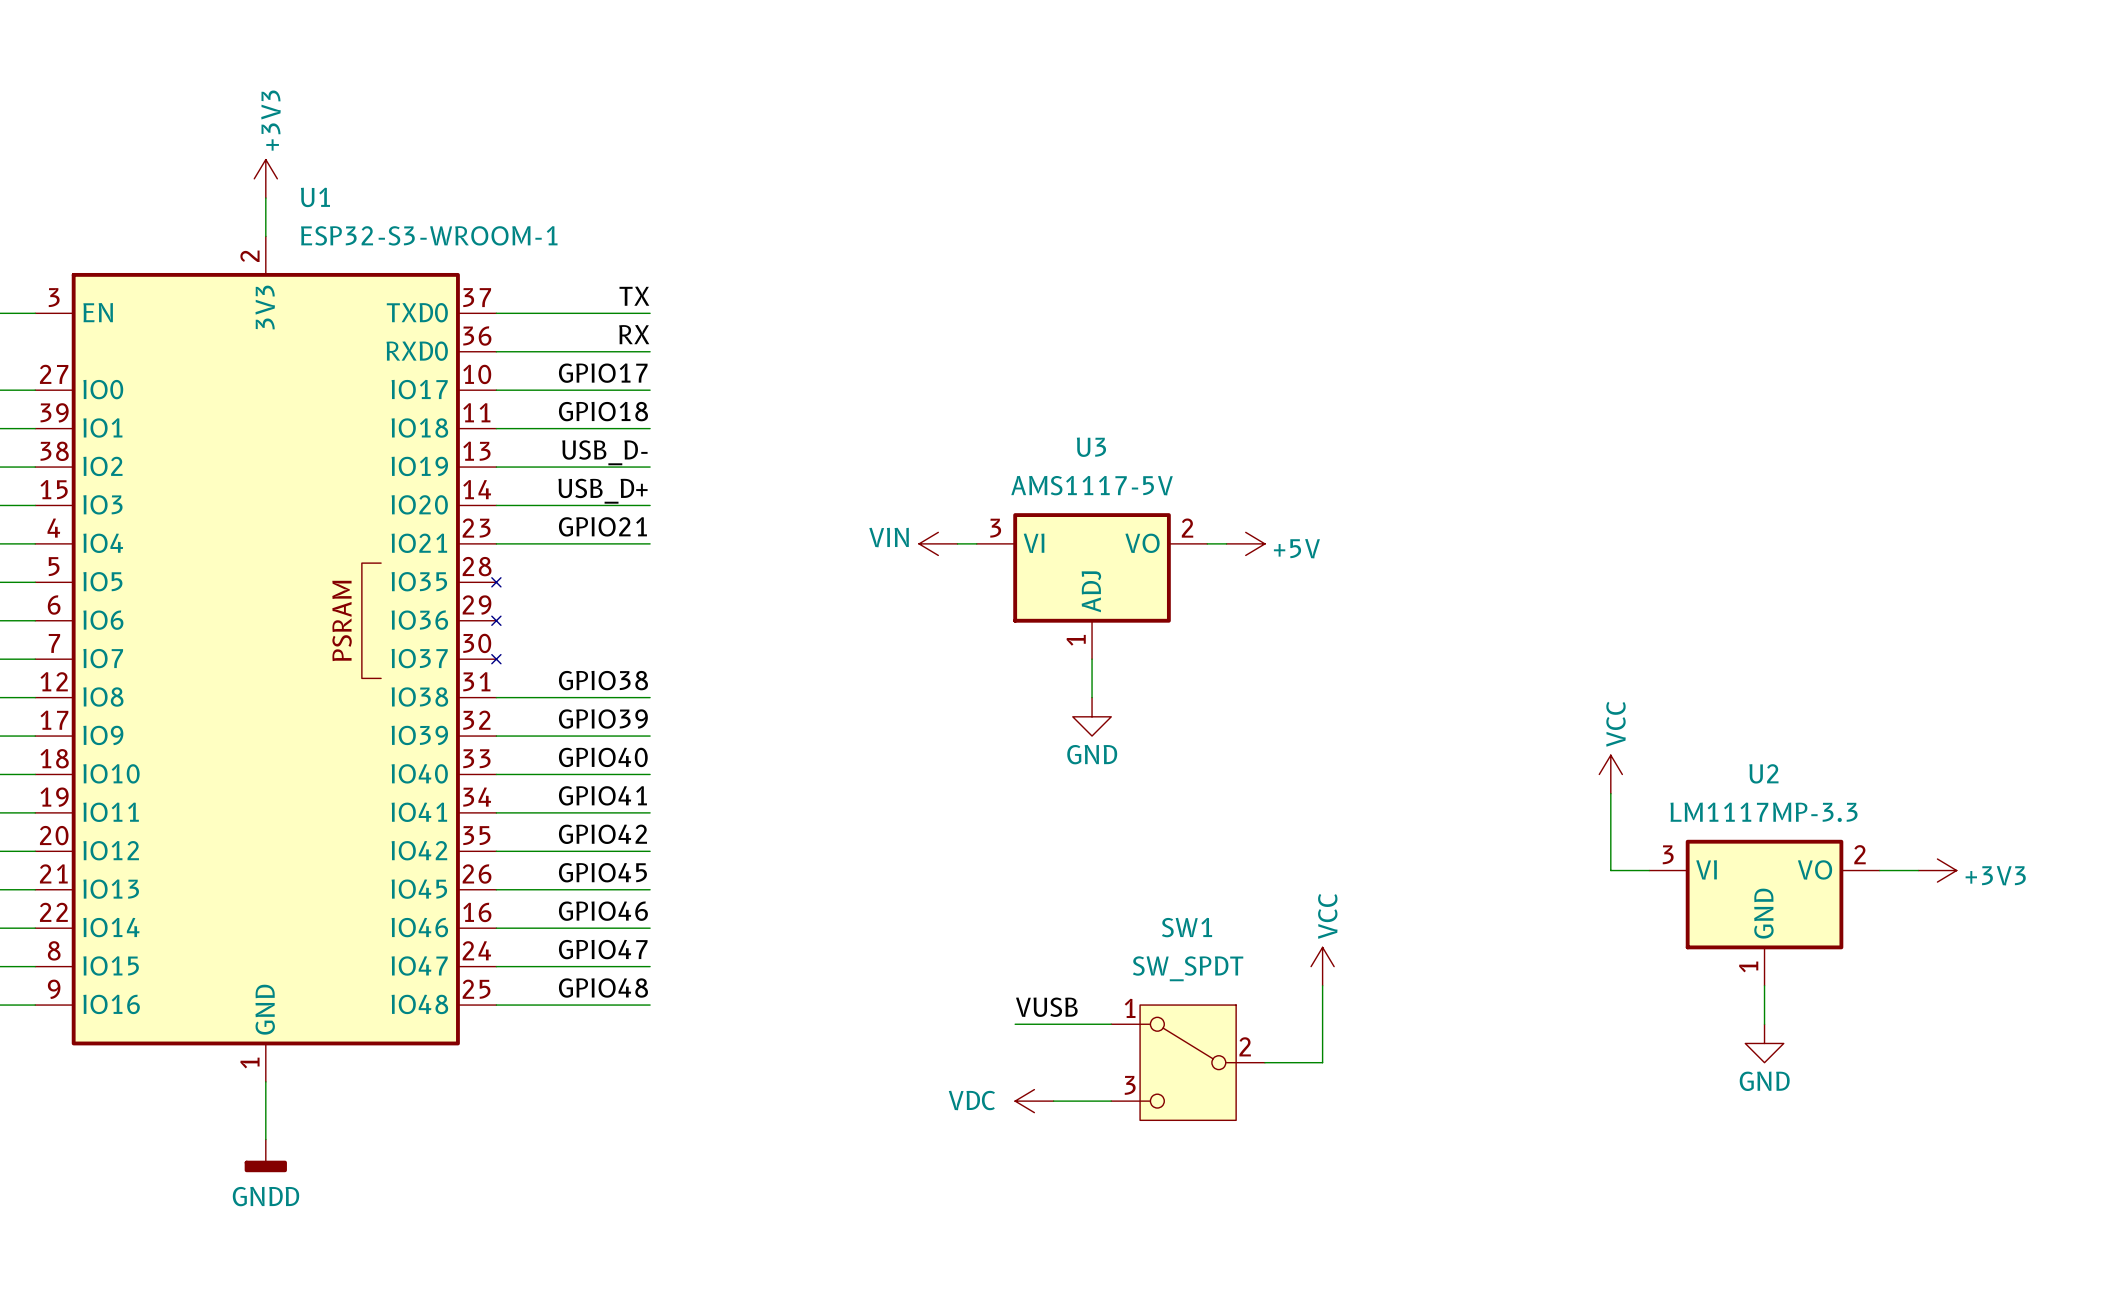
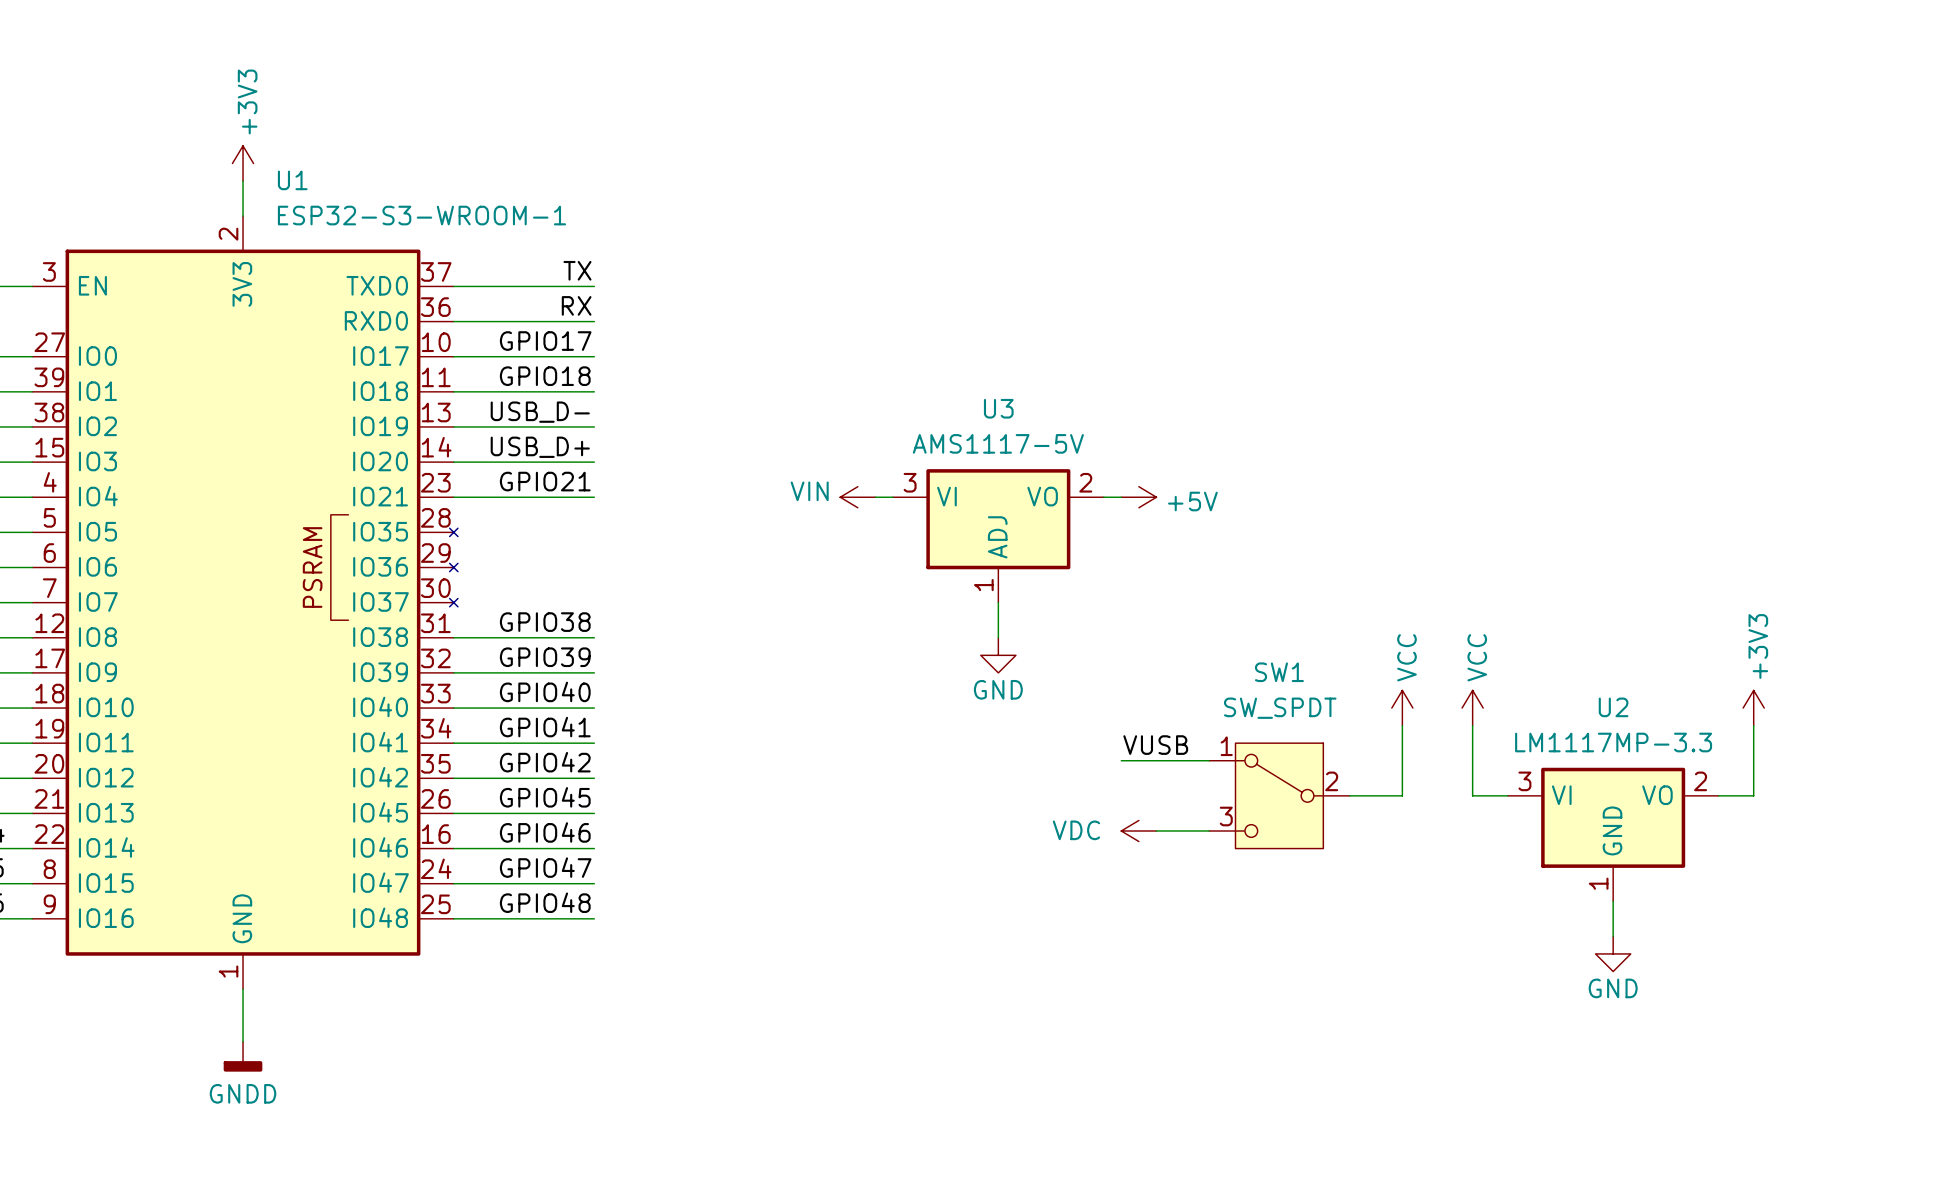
wire: none -> (1753, 725) (1753, 795)
power symbol rotation: 0° (1937, 870) -> 90° counterclockwise (1753, 708)
power symbol position: +3V3 (1937, 870) -> +3V3 (1753, 708)
power symbol position: VCC (1322, 966) -> VCC (1402, 708)
wire: (1322, 985) (1322, 1062) (1264, 1062) -> (1402, 725) (1402, 795) (1349, 795)
label position: VUSB (1046, 1007) -> VUSB (1155, 745)
wire: (1015, 1024) (1111, 1024) -> (1121, 760) (1209, 760)
SW1 position: (1188, 1062) -> (1279, 795)
power symbol position: VDC (1034, 1101) -> VDC (1138, 831)
wire: (1053, 1101) (1111, 1101) -> (1156, 831) (1209, 831)

